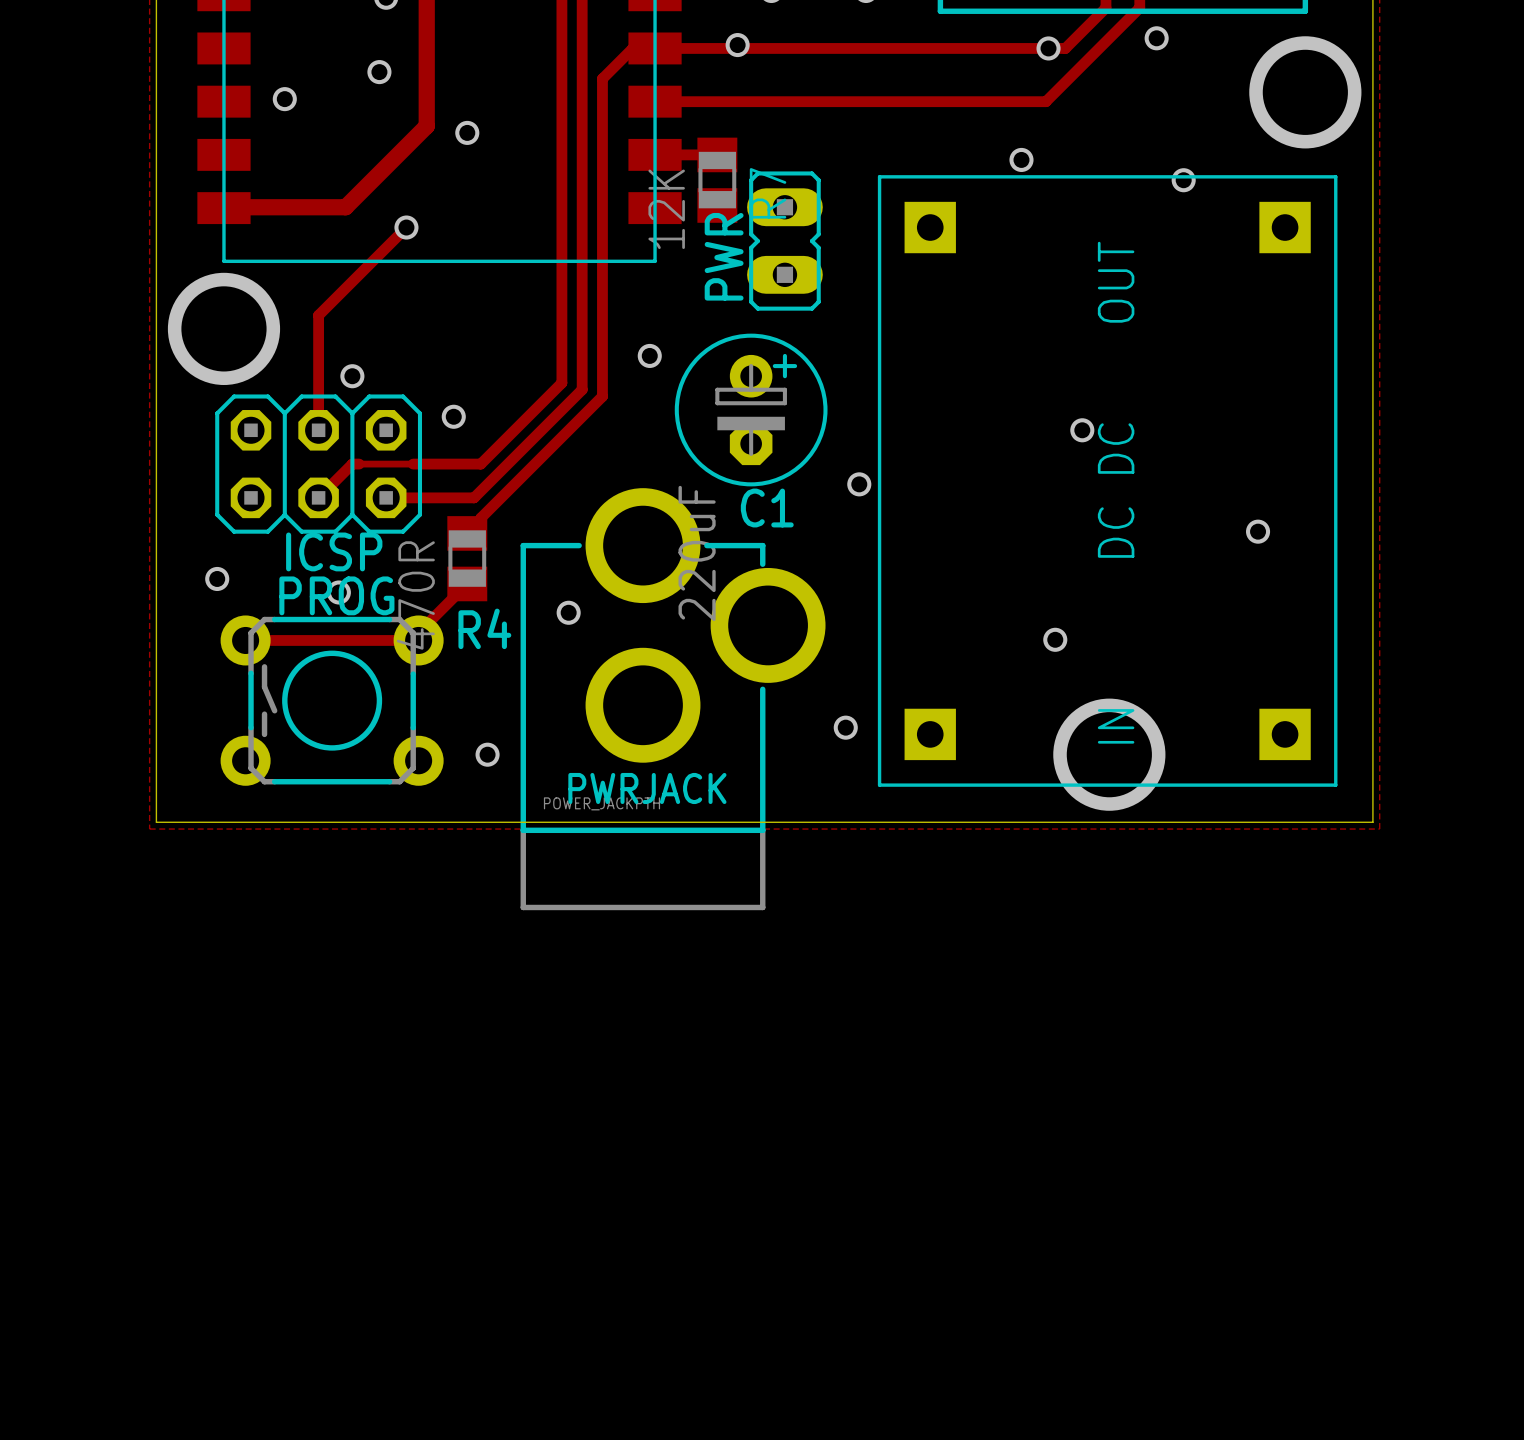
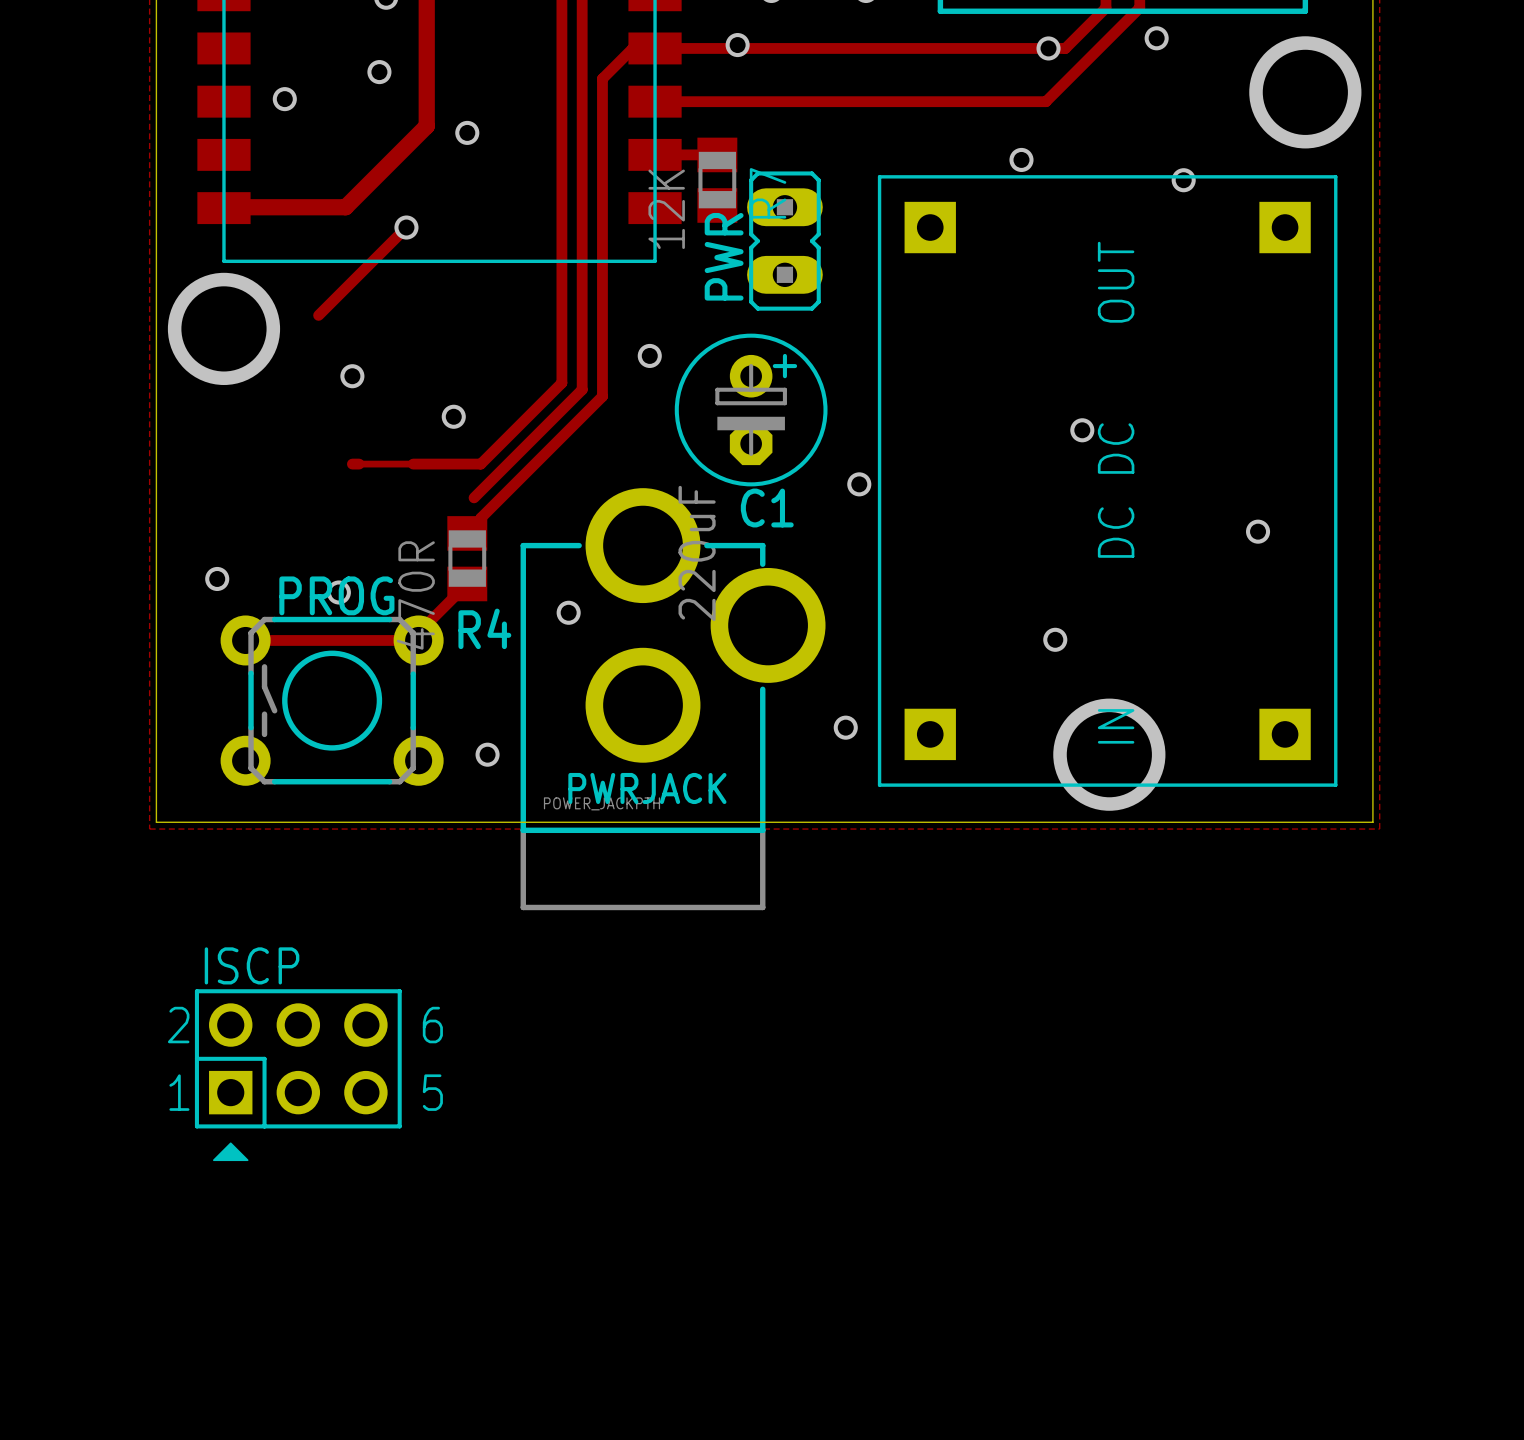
track: (318, 315) (318, 430) -> none
ICSP: (318, 464) -> none
track: (352, 464) (318, 497) -> none
track: (386, 497) (474, 497) -> none
ISCP: none -> (298, 1075)

